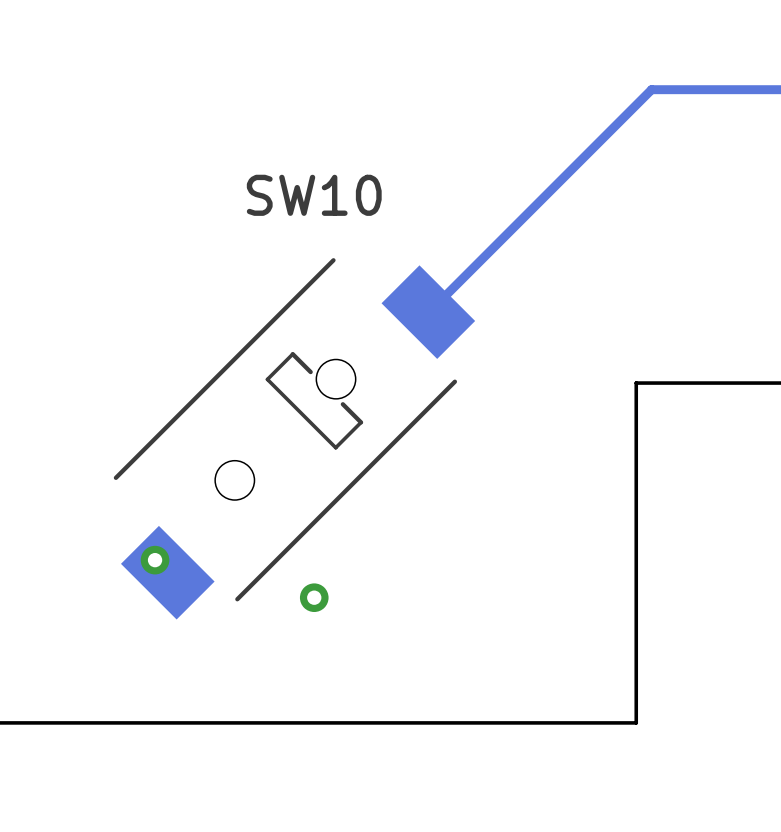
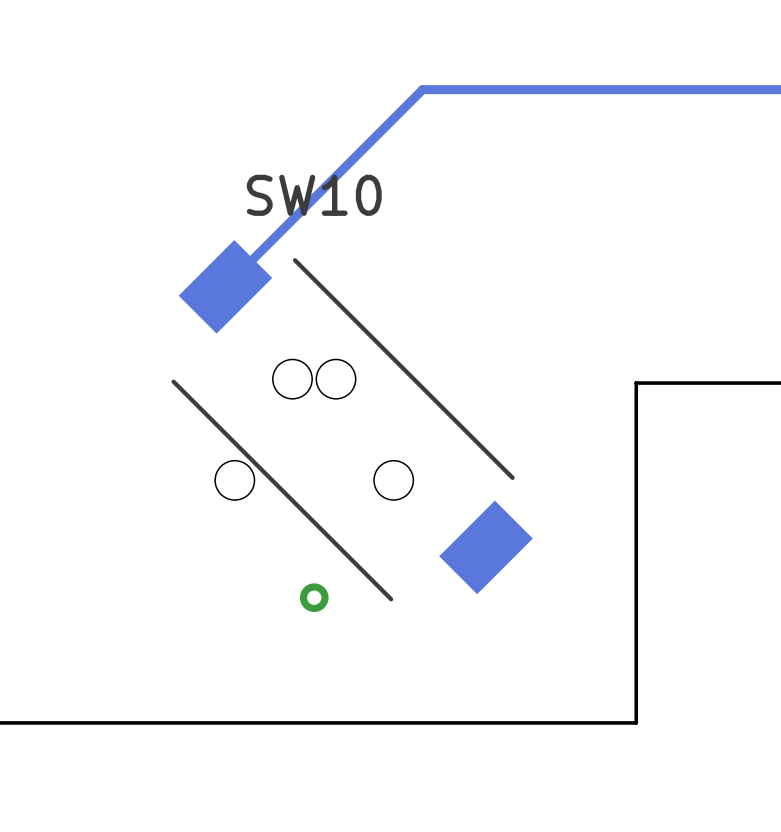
track: (651, 89) (428, 312) -> (651, 89) (422, 89) (225, 286)
SW10 footprint: [113, 258, 476, 620] -> [171, 240, 533, 602]
via: (155, 560) -> none

